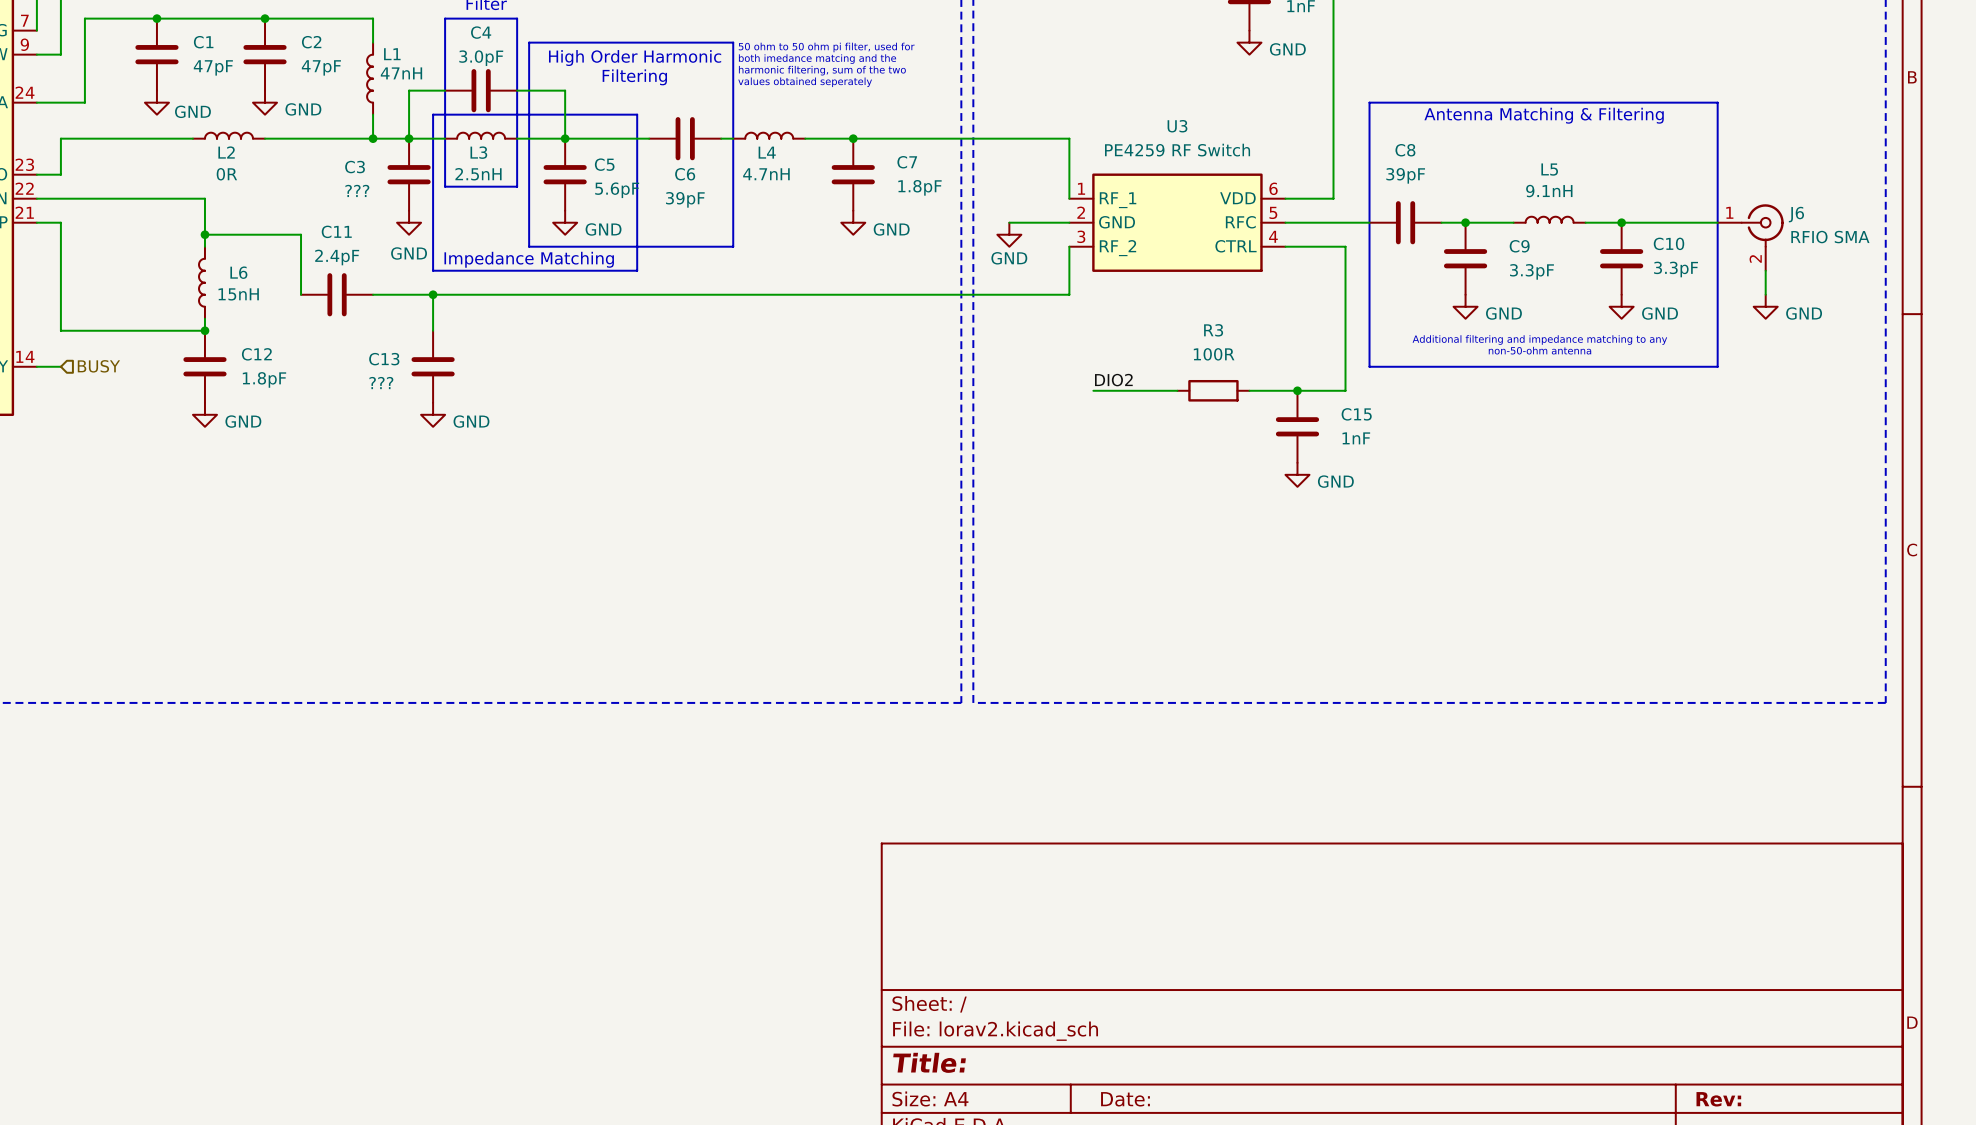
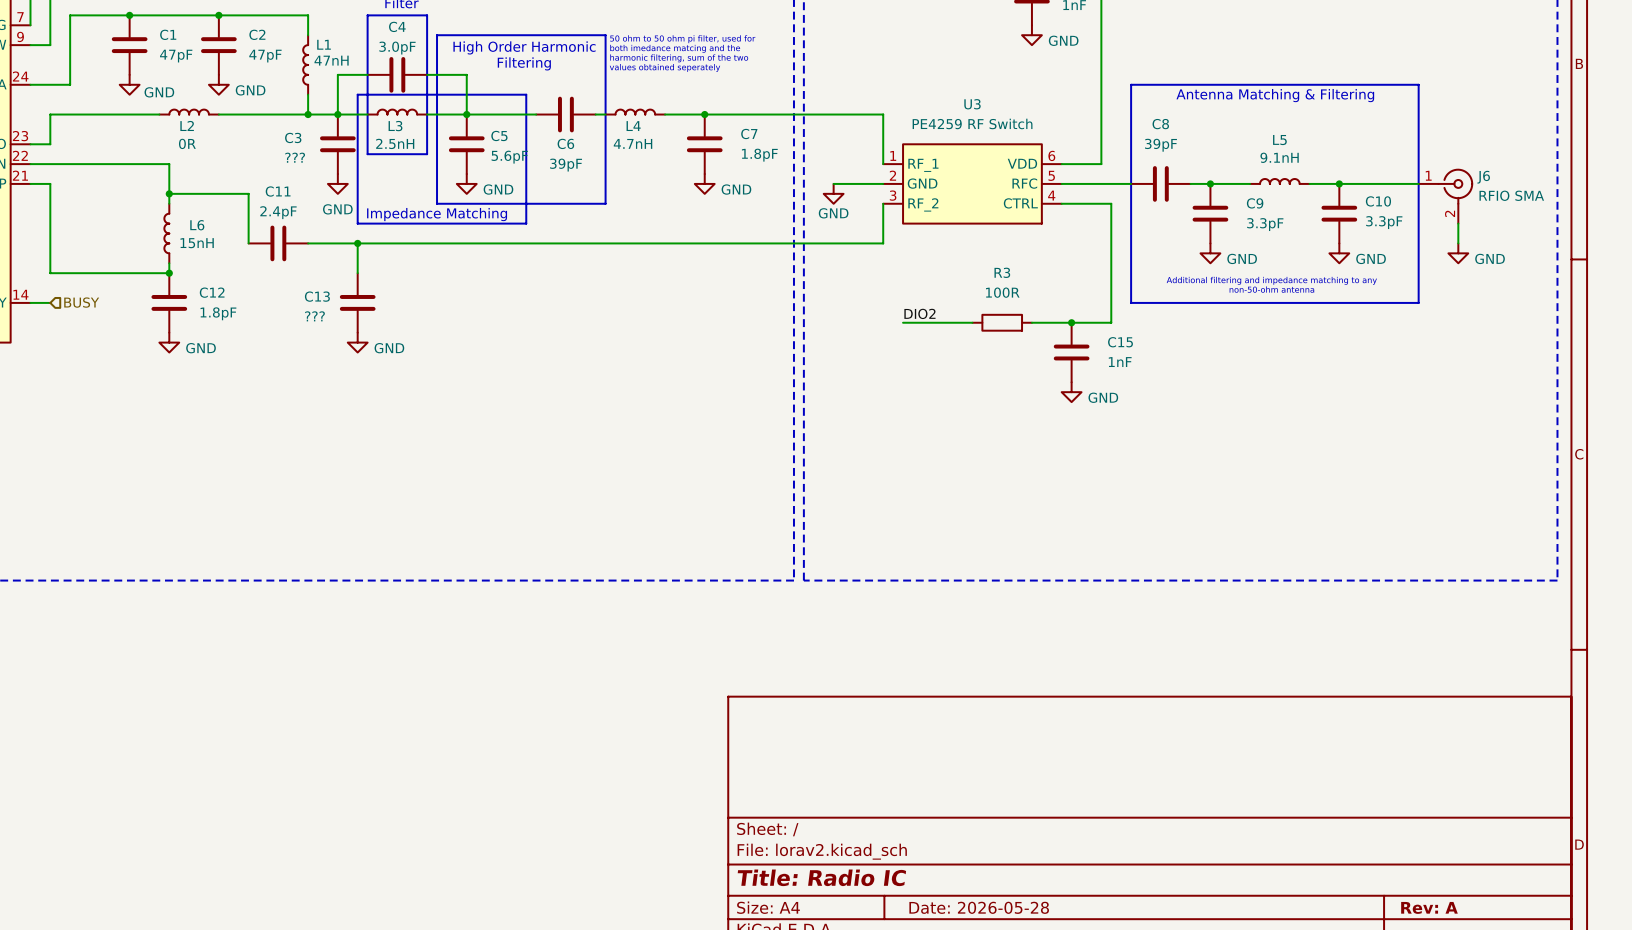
title block: Title: (929, 1062) -> Title: Radio IC (821, 877)
title block: Date: (1125, 1099) -> Date: 2026-05-28 (979, 907)
title block: Rev: (1718, 1099) -> Rev: A (1429, 907)

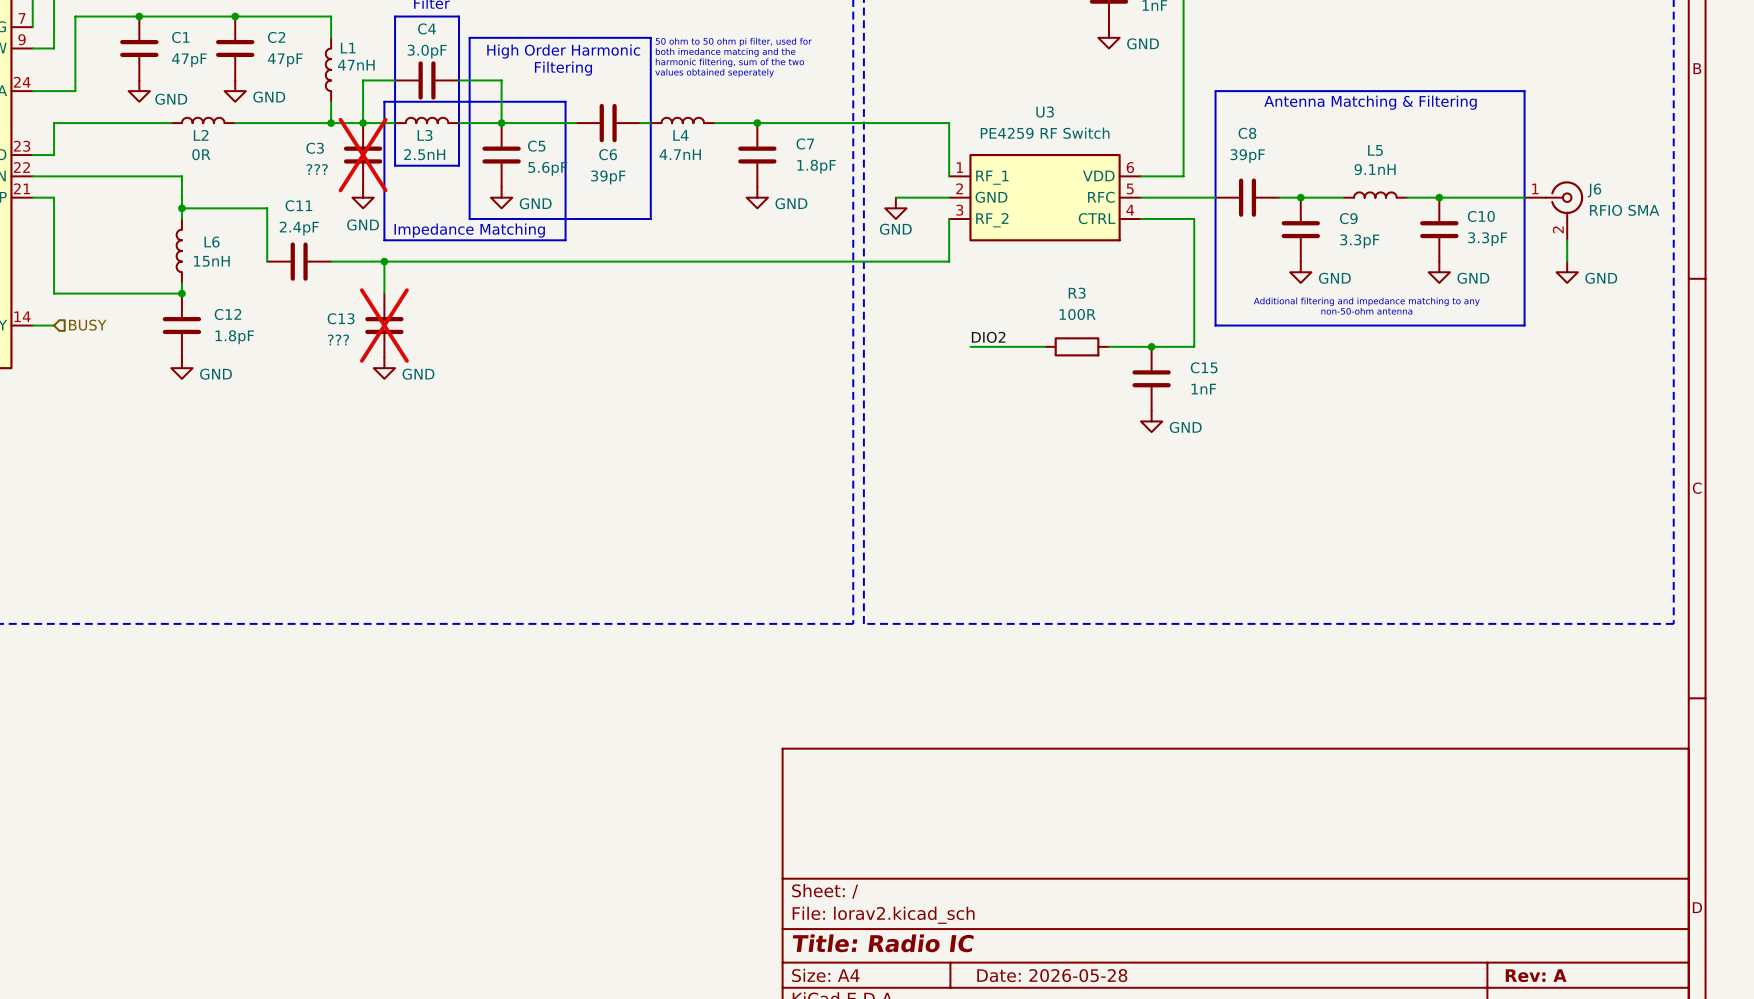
C3 do-not-place cross: none -> (363, 155)
C13 do-not-place cross: none -> (384, 325)

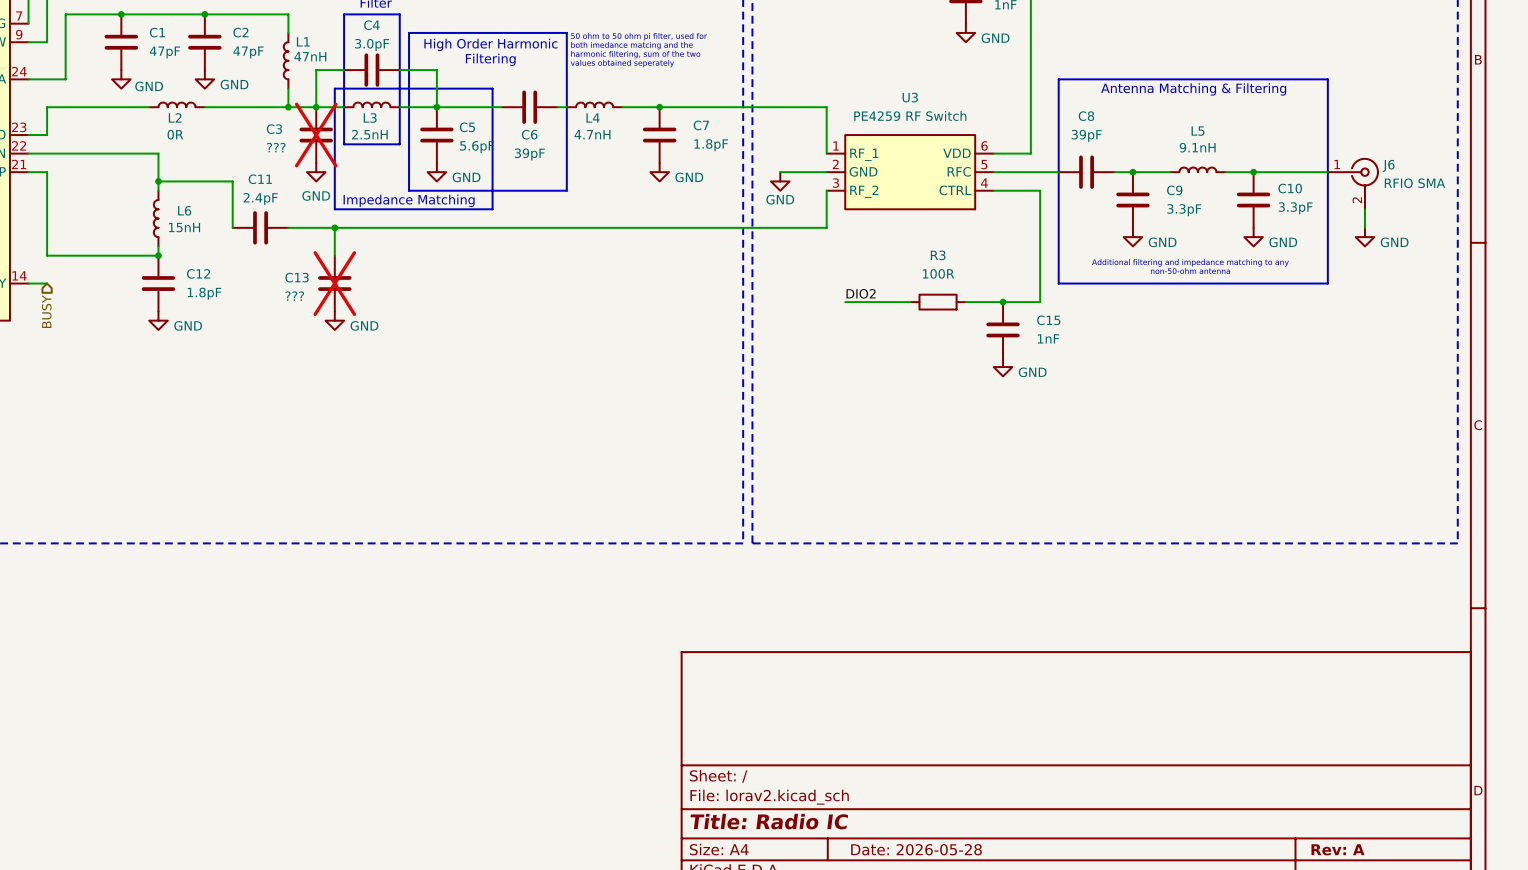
hierarchical label rotation: 0° (87, 325) -> 90° clockwise (46, 311)
hierarchical label position: BUSY (87, 325) -> BUSY (46, 311)

